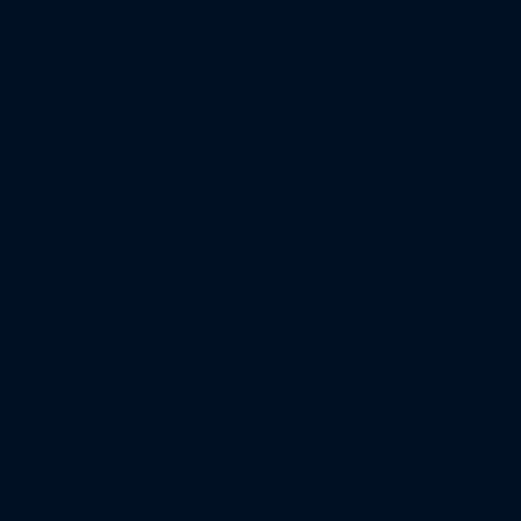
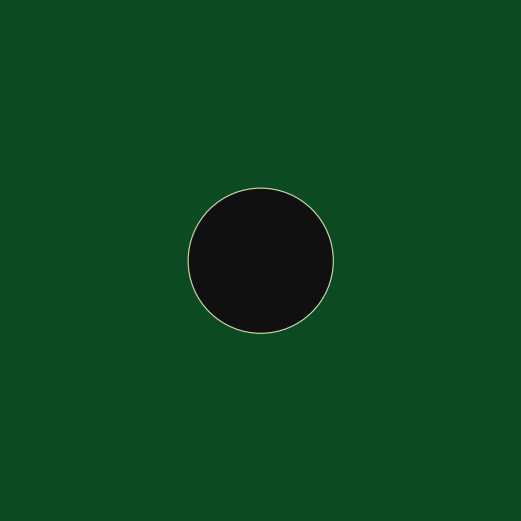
part: none -> (260, 260)

